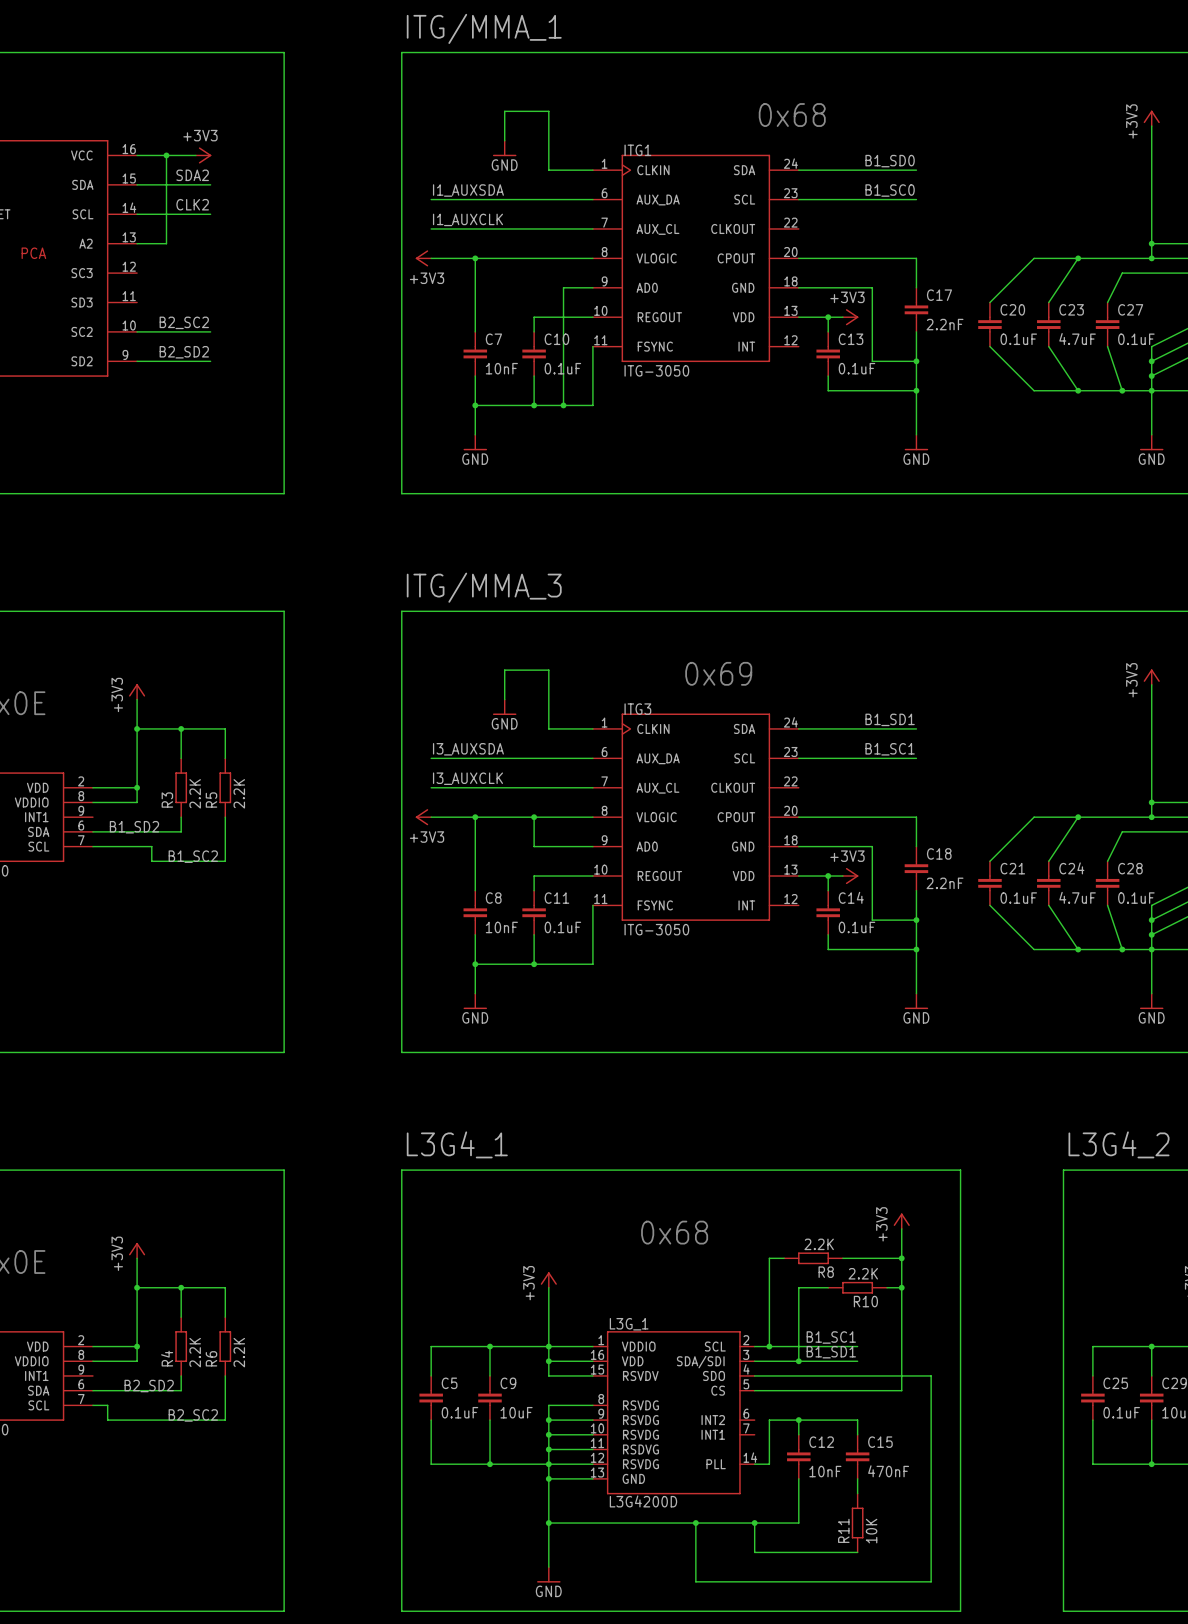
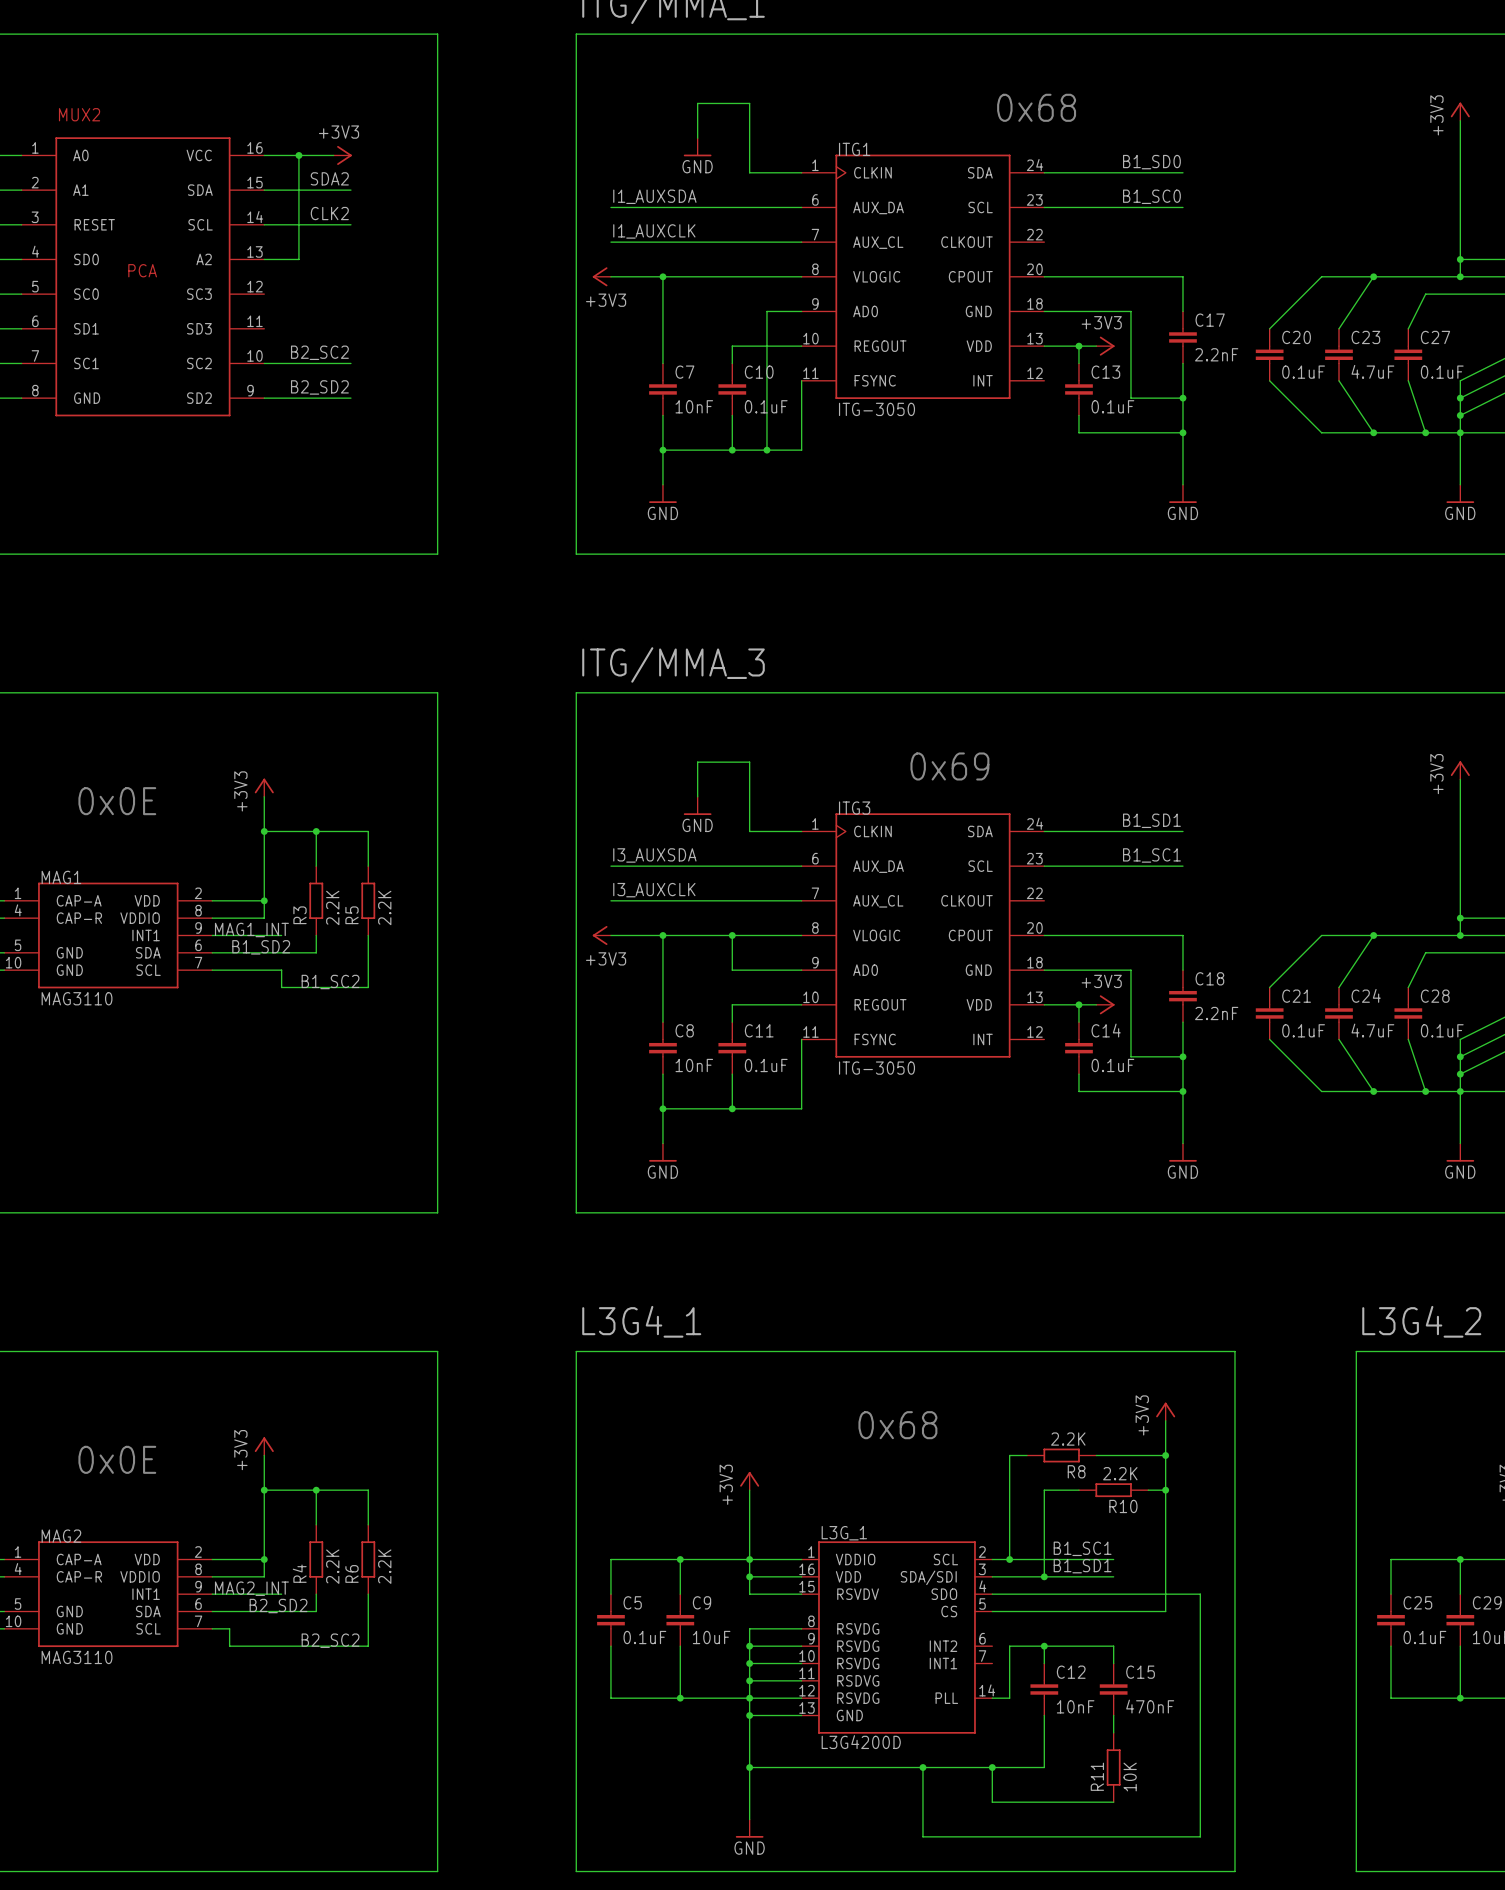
label: none -> MAG1_INT (251, 930)
wire: none -> (212, 935) (281, 935)
label: none -> MAG2_INT (251, 1588)
wire: none -> (212, 1594) (281, 1594)

